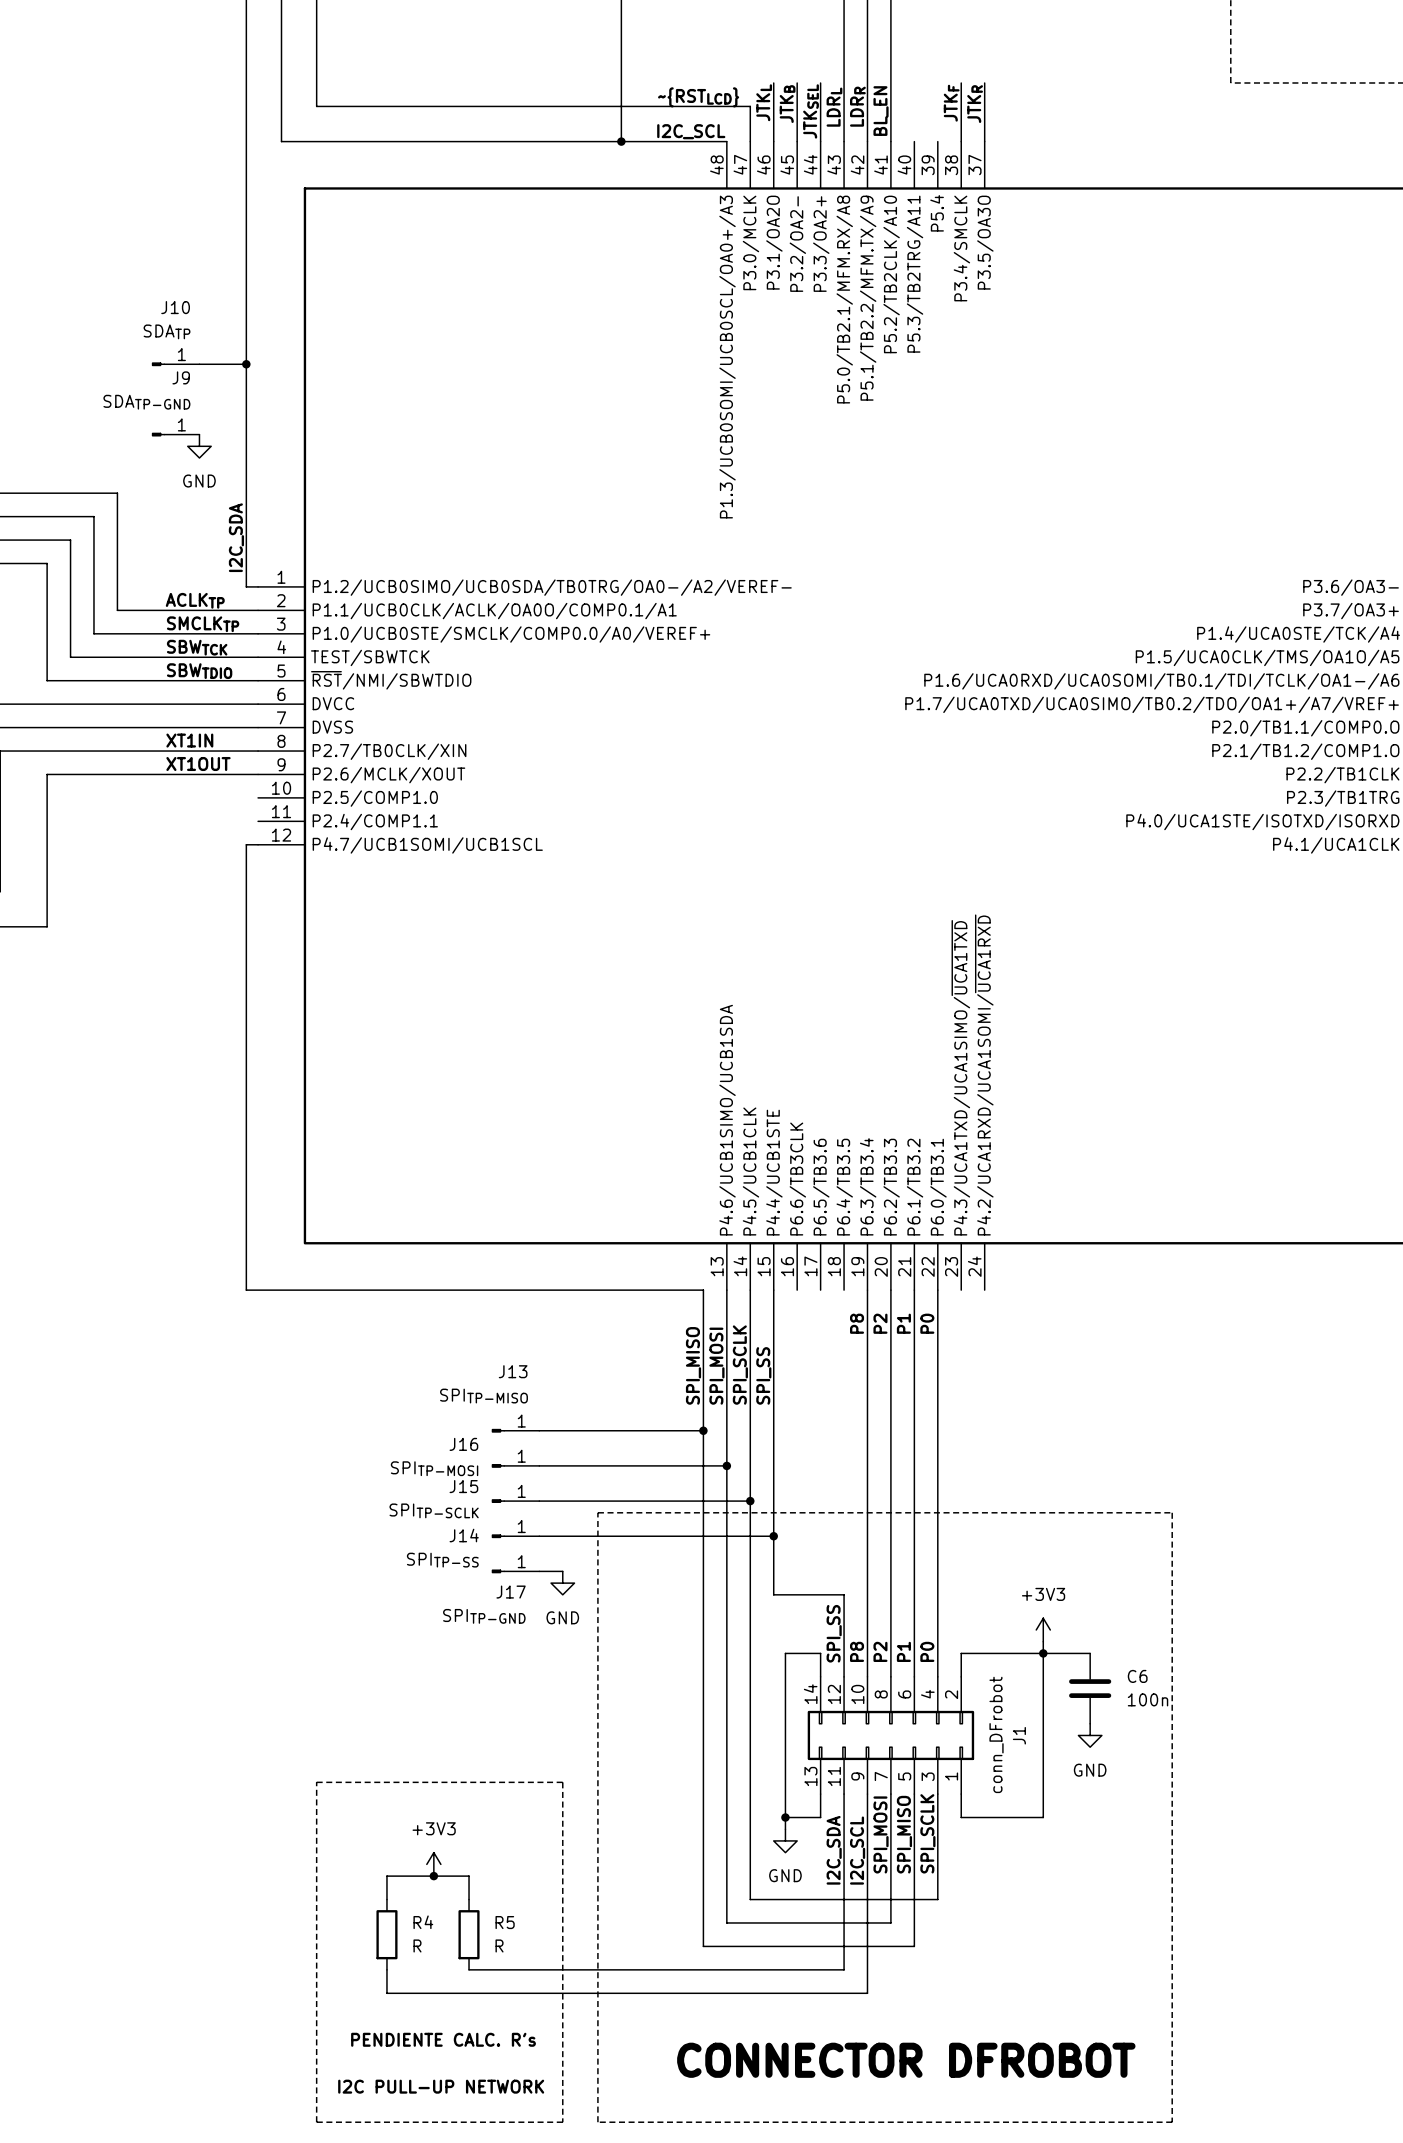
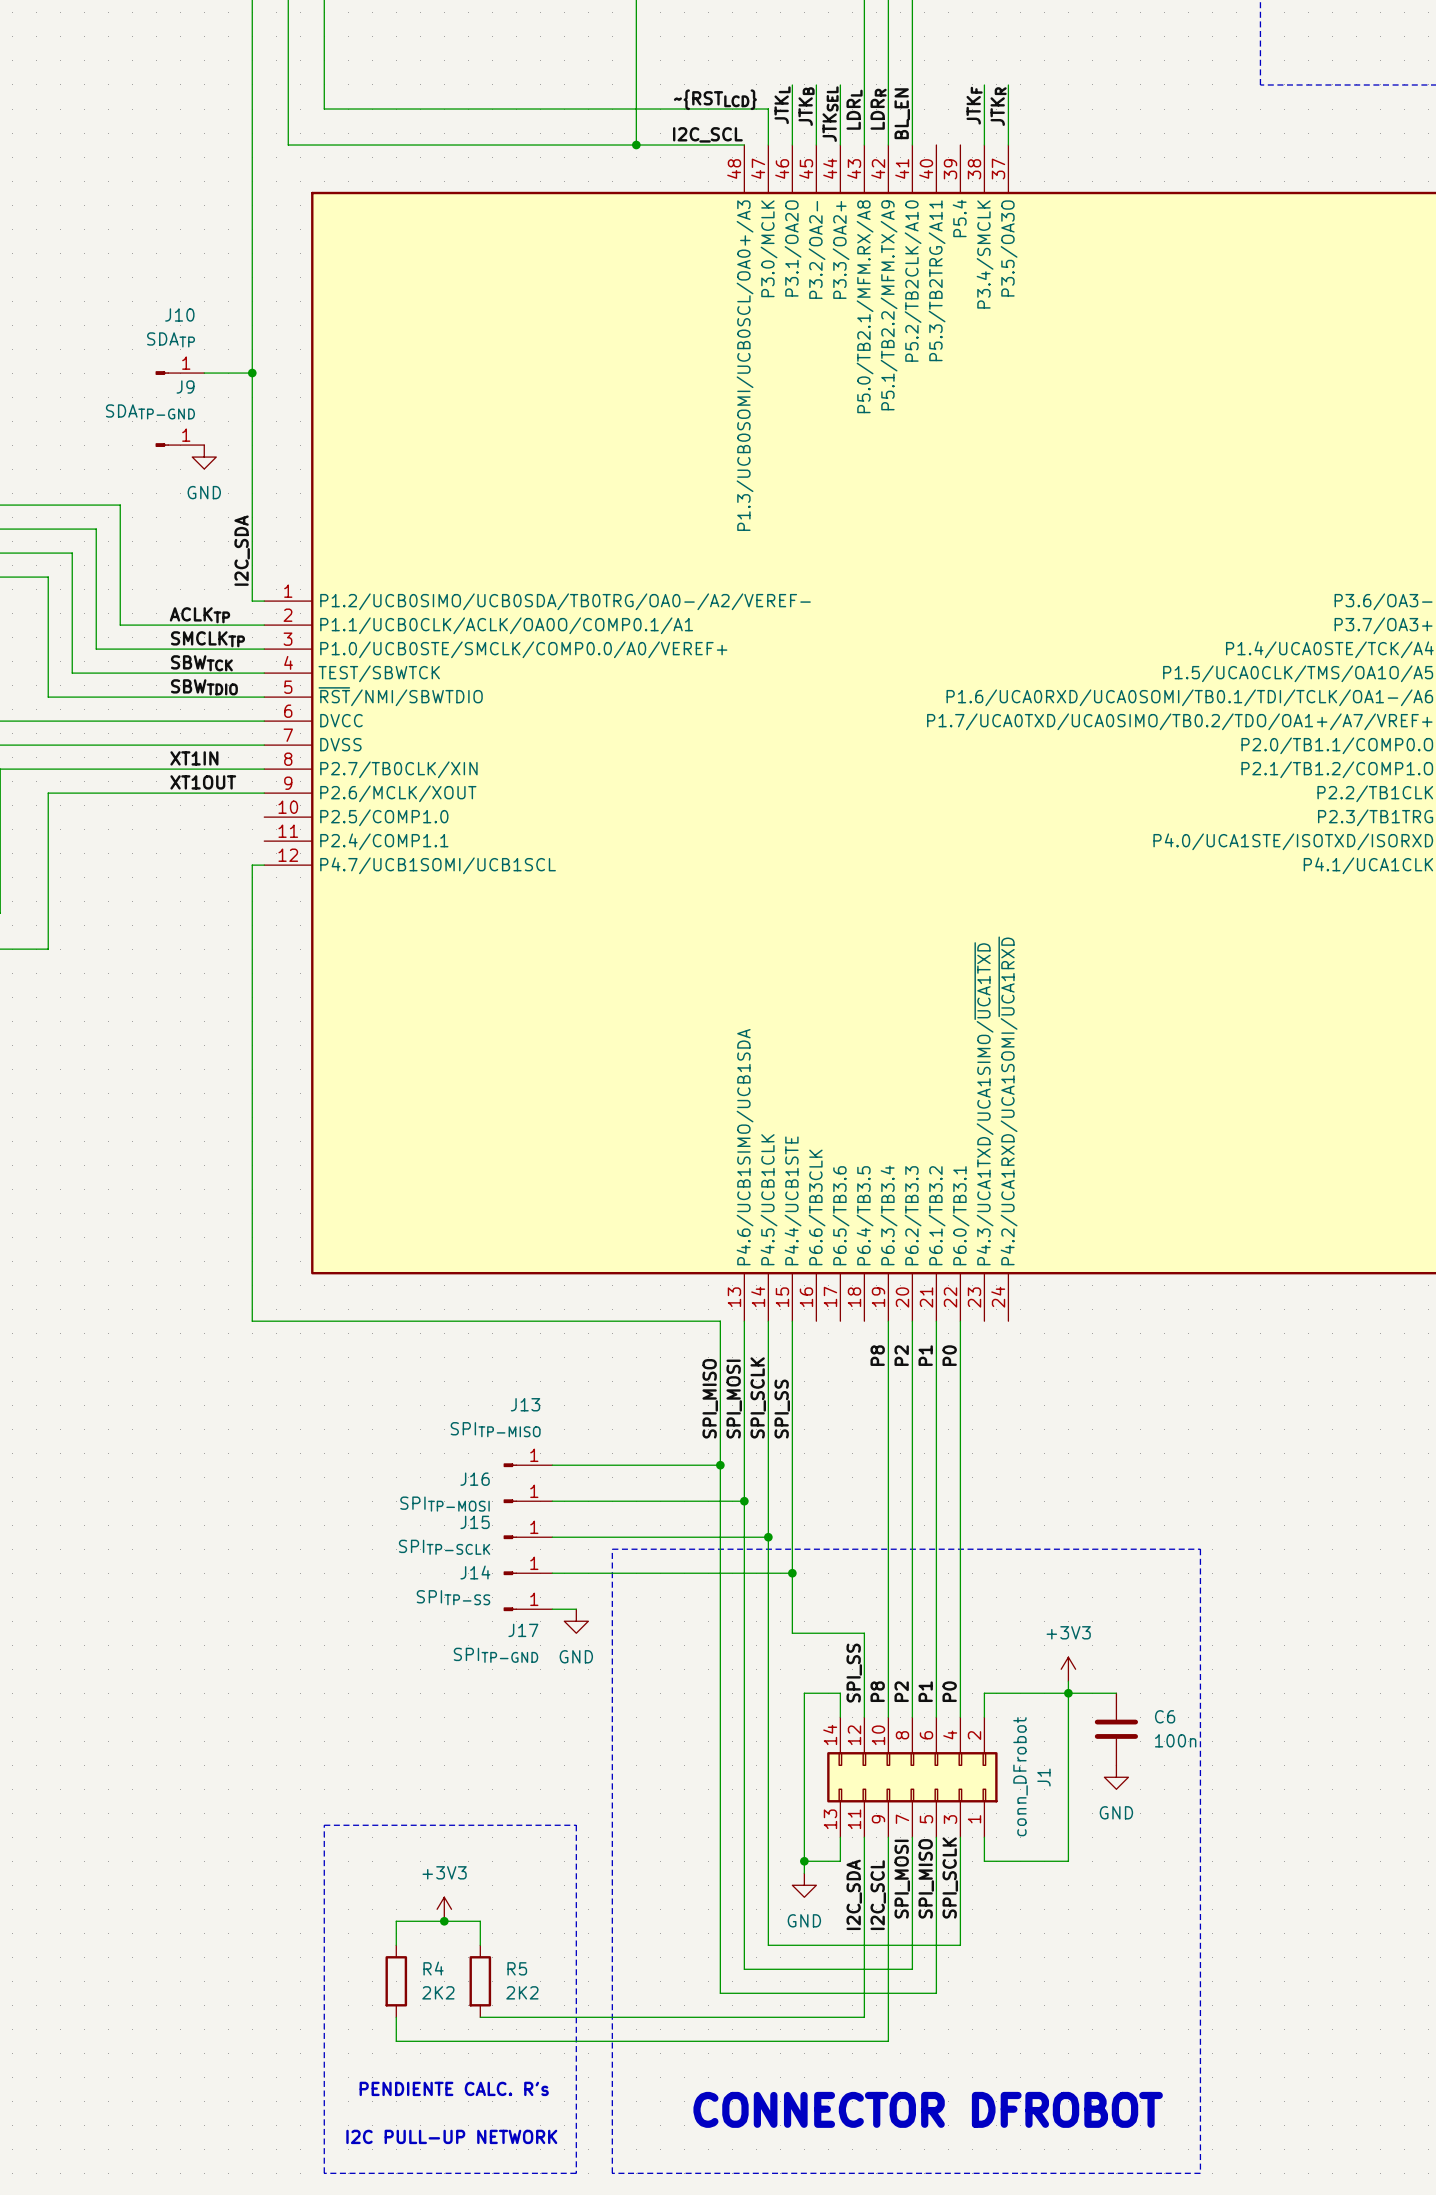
R4 value: R (417, 1945) -> 2K2 (438, 1992)
R5 value: R (499, 1945) -> 2K2 (522, 1992)

